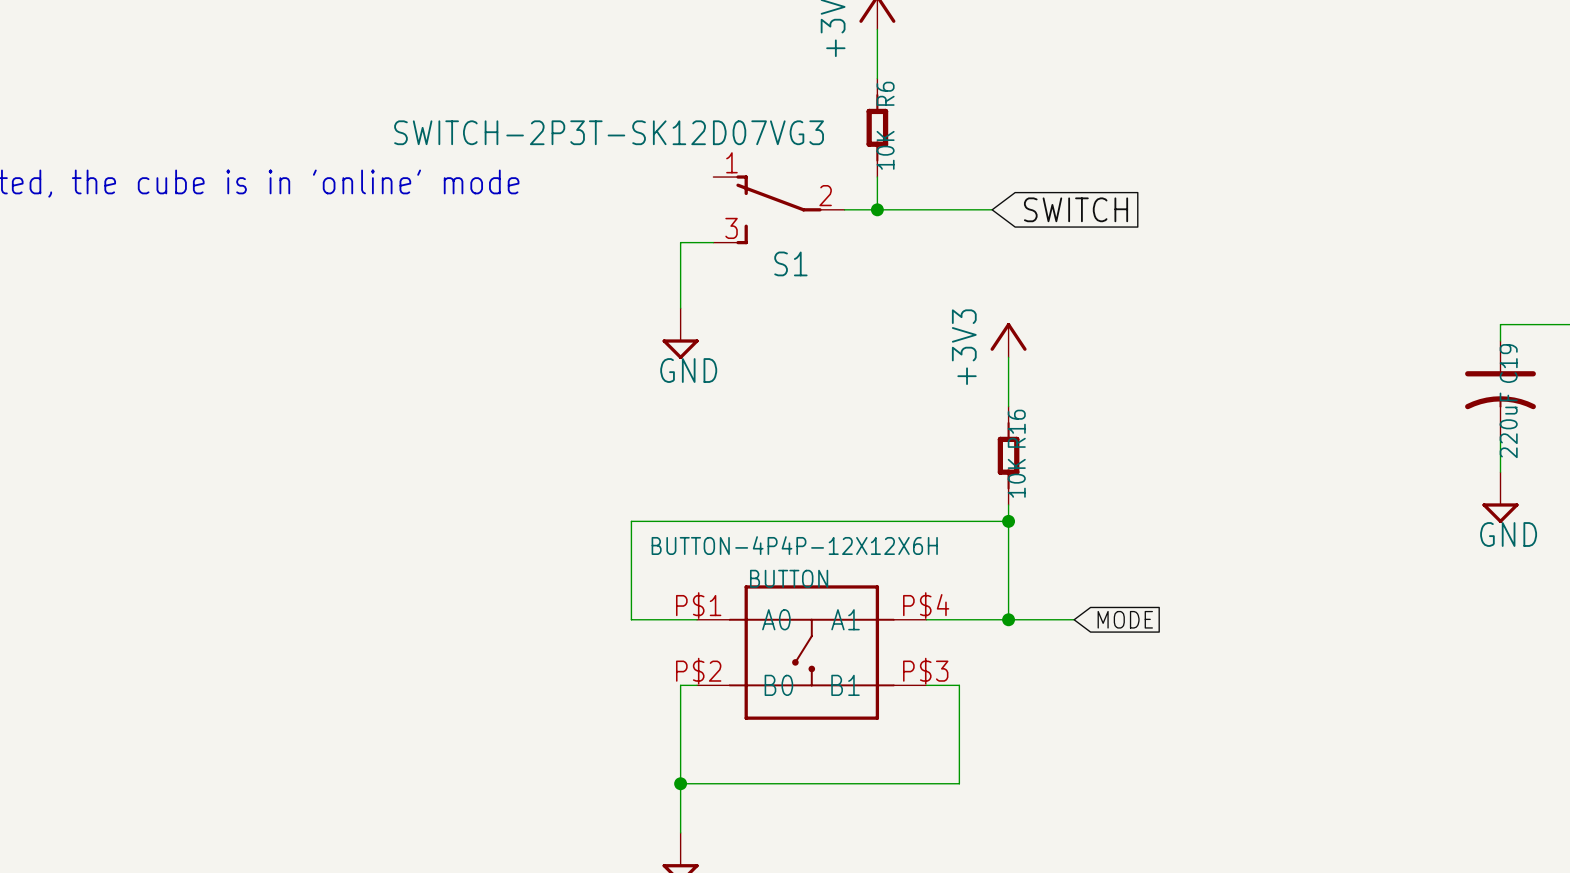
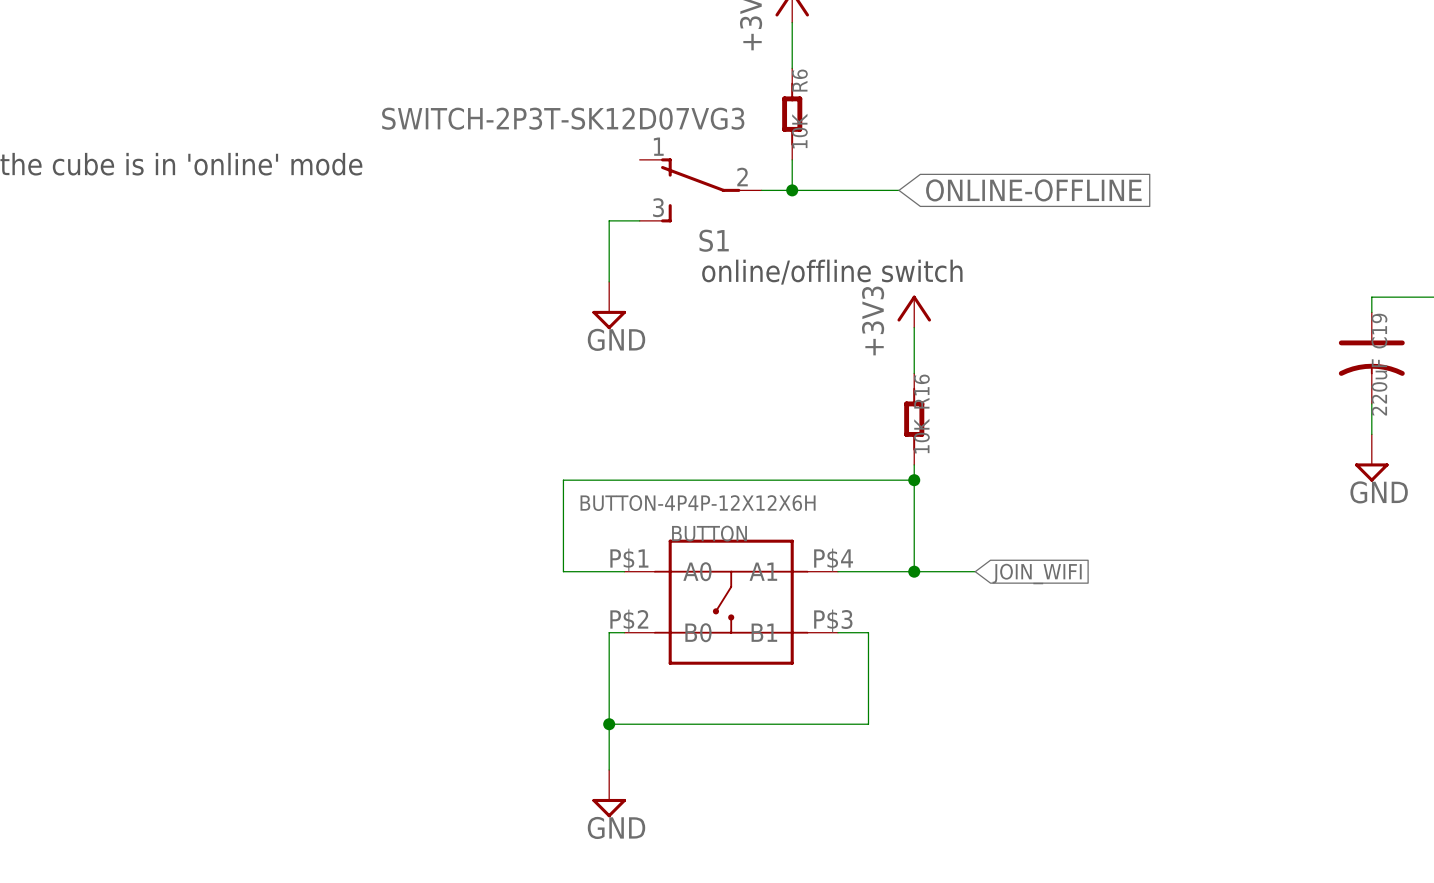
global label: SWITCH (1076, 209) -> ONLINE-OFFLINE (1033, 190)
text: none -> online/offline switch (832, 272)
global label: MODE (1125, 619) -> JOIN_WIFI (1037, 574)

